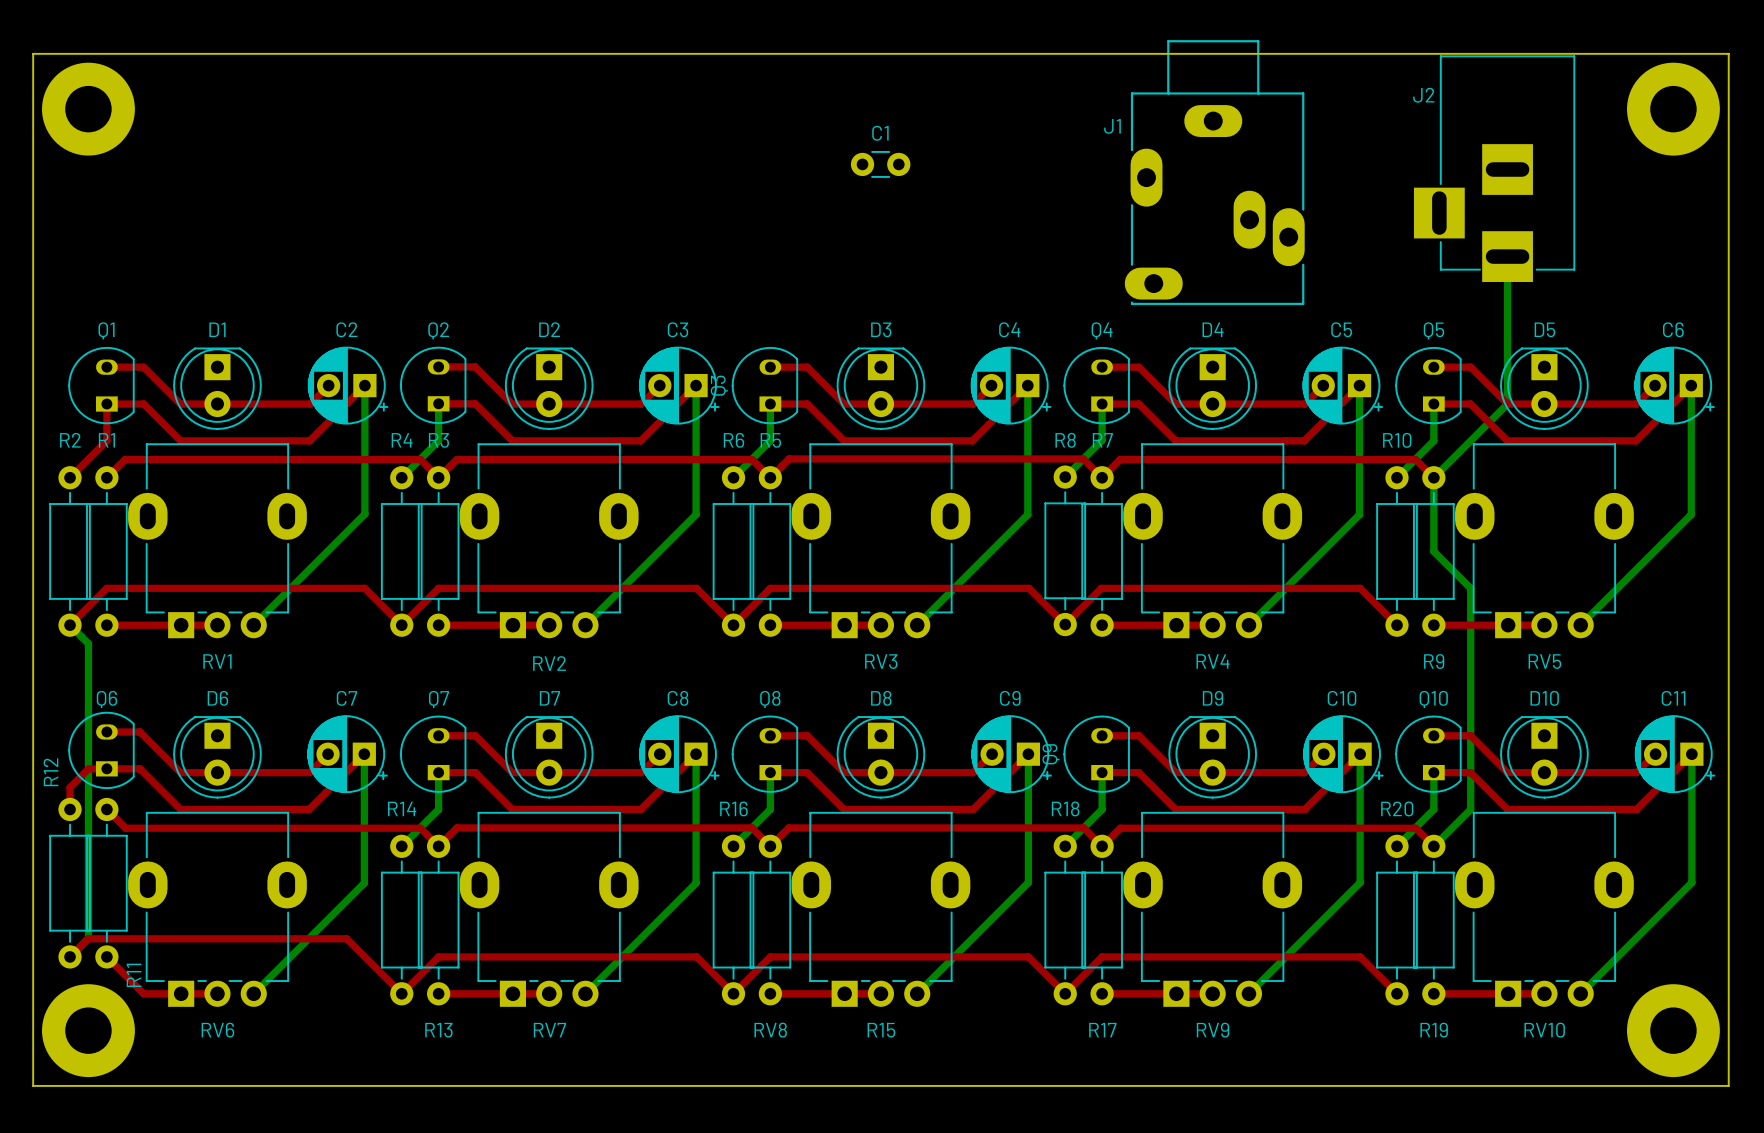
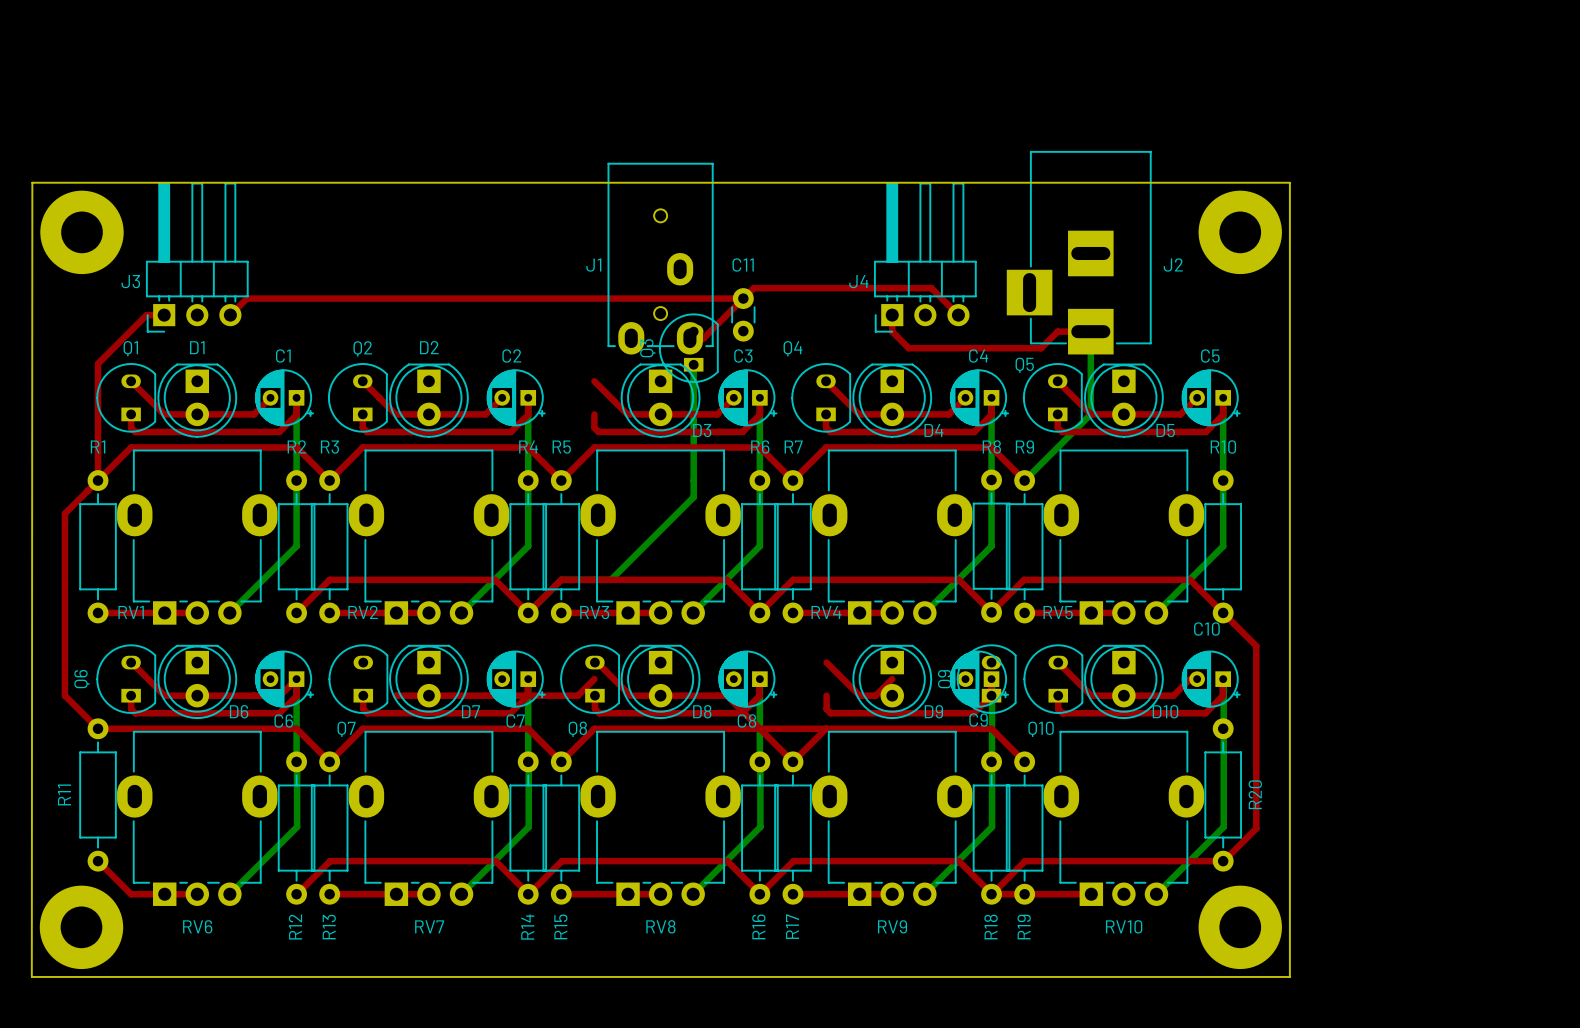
J1 footprint: [1124, 40, 1305, 305] -> [607, 162, 714, 355]
J2 name position: J2 (1423, 95) -> J2 (1173, 264)
part position: (88, 109) -> (81, 232)
part position: (1673, 109) -> (1240, 232)
J1 name position: J1 (1112, 126) -> J1 (593, 265)
C1 footprint: [850, 151, 911, 178] -> [255, 369, 314, 427]
J2 position: (1494, 168) -> (1079, 252)
bottom track: (1507, 269) (1507, 404) (1433, 477) (1433, 551) (1470, 588) (1470, 809) (1433, 846) -> none
J3: none -> (197, 257)
J4: none -> (925, 257)
D3 name position: D3 (881, 329) -> D3 (702, 430)
D4 name position: D4 (1213, 329) -> D4 (933, 430)
D5 name position: D5 (1544, 329) -> D5 (1165, 430)
C6 name position: C6 (1673, 329) -> C6 (283, 721)
top track: none -> (743, 298) (246, 298) (230, 315)
Q4 name position: Q4 (1102, 330) -> Q4 (792, 348)
Q5 name position: Q5 (1433, 330) -> Q5 (1024, 365)
C2 footprint: [307, 346, 389, 425] -> [486, 369, 546, 427]
C3 footprint: [639, 346, 720, 425] -> [718, 369, 778, 427]
C4 footprint: [970, 346, 1052, 425] -> [950, 369, 1009, 427]
C5 footprint: [1302, 346, 1383, 425] -> [1181, 369, 1241, 427]
C6 footprint: [1634, 346, 1715, 425] -> [255, 650, 314, 708]
D4 footprint: [1168, 347, 1257, 430] -> [852, 363, 932, 438]
top track: none -> (892, 315) (892, 331) (908, 348) (1041, 348) (1057, 331) (1090, 331)
top track: none -> (958, 315) (931, 288) (753, 288) (703, 338) (689, 338)
top track: (438, 366) (475, 366) (512, 404) (641, 404) (659, 385) -> none
top track: (106, 367) (143, 367) (180, 404) (310, 404) (328, 385) -> none
top track: (770, 367) (807, 367) (844, 404) (973, 404) (991, 385) -> none
top track: (1102, 367) (1138, 367) (1175, 404) (1304, 404) (1323, 385) -> none
bottom track: none -> (1090, 331) (1090, 414) (1024, 480)
top track: (1433, 367) (1470, 367) (1507, 404) (1636, 404) (1655, 385) -> none
Q1 position: (101, 385) -> (126, 397)
top track: (364, 385) (309, 440) (180, 440) (143, 404) (106, 404) -> (164, 315) (146, 315) (98, 364)
bottom track: (364, 385) (364, 514) (253, 625) -> none
Q2 position: (433, 385) -> (357, 397)
top track: (696, 385) (640, 440) (512, 440) (475, 403) (438, 403) -> none
bottom track: (696, 385) (696, 514) (585, 625) -> none
top track: (1027, 385) (972, 440) (844, 440) (807, 404) (770, 404) -> none
bottom track: (1027, 385) (1027, 514) (917, 625) -> none
Q4 position: (1096, 385) -> (821, 397)
top track: (1359, 385) (1304, 440) (1175, 440) (1138, 404) (1102, 404) -> none
bottom track: (1359, 385) (1359, 514) (1248, 625) -> none
Q5 position: (1428, 385) -> (1052, 397)
top track: (1691, 385) (1636, 440) (1507, 440) (1470, 404) (1433, 404) -> none
bottom track: (1691, 385) (1691, 514) (1580, 625) -> none
D1 position: (217, 388) -> (197, 400)
D2 position: (549, 388) -> (428, 400)
D3 position: (880, 388) -> (660, 400)
D5 position: (1544, 388) -> (1123, 400)
bottom track: (438, 403) (438, 440) (401, 477) -> none
bottom track: (1102, 404) (1102, 440) (1065, 477) -> none
bottom track: (1433, 404) (1433, 440) (1396, 477) -> none
top track: none -> (131, 381) (164, 414) (253, 414) (270, 397)
top track: none -> (362, 381) (395, 414) (485, 414) (502, 397)
top track: none -> (594, 381) (627, 414) (717, 414) (733, 397)
top track: none -> (826, 381) (859, 414) (948, 414) (965, 397)
top track: none -> (1057, 381) (1090, 414) (1180, 414) (1197, 397)
top track: (106, 440) (70, 477) -> (98, 397) (98, 480)
top track: none -> (296, 397) (296, 414) (279, 431) (135, 431) (131, 427) (131, 414)
bottom track: none -> (296, 397) (296, 546) (229, 612)
top track: none -> (528, 397) (528, 414) (511, 431) (367, 431) (362, 427) (362, 414)
bottom track: none -> (528, 397) (528, 546) (461, 612)
bottom track: (770, 440) (733, 477) -> (693, 397) (693, 497) (610, 579) (561, 579) (528, 612)
top track: none -> (759, 397) (759, 414) (742, 431) (598, 431) (594, 427) (594, 414)
bottom track: none -> (759, 397) (759, 546) (693, 612)
top track: none -> (991, 397) (991, 414) (974, 431) (830, 431) (826, 427) (826, 414)
bottom track: none -> (991, 397) (991, 546) (924, 612)
top track: none -> (1223, 397) (1223, 414) (1205, 431) (1061, 431) (1057, 427) (1057, 414)
bottom track: none -> (1223, 397) (1223, 546) (1156, 612)
top track: (106, 477) (125, 459) (420, 459) (438, 477) (456, 459) (752, 459) (770, 477) (789, 458) (1083, 458) (1102, 477) (1120, 459) (1415, 459) (1433, 477) -> none
RV1 position: (217, 540) -> (197, 537)
RV2 position: (549, 540) -> (428, 537)
RV3 position: (880, 540) -> (660, 537)
RV4 position: (1212, 540) -> (892, 537)
RV5 position: (1544, 540) -> (1123, 537)
R8 position: (1065, 550) -> (991, 546)
R2 position: (70, 551) -> (296, 546)
R1 position: (106, 551) -> (98, 546)
R4 position: (401, 551) -> (528, 546)
R3 position: (438, 551) -> (329, 546)
R6 position: (733, 551) -> (759, 546)
R5 position: (770, 551) -> (561, 546)
R7 position: (1102, 551) -> (792, 546)
R10 position: (1396, 551) -> (1223, 546)
R9 position: (1433, 551) -> (1024, 546)
top track: (70, 625) (106, 588) (364, 588) (401, 625) (438, 588) (696, 588) (733, 625) (770, 588) (1029, 588) (1065, 624) (1101, 588) (1360, 588) (1396, 625) -> none
bottom track: (70, 625) (88, 643) (88, 938) (70, 956) -> none
top track: (106, 625) (217, 625) -> (98, 612) (197, 612)
top track: (438, 625) (549, 625) -> (329, 612) (428, 612)
top track: (770, 625) (880, 625) -> (792, 612) (892, 612)
top track: (1102, 625) (1212, 625) -> (1024, 612) (1123, 612)
top track: (1433, 625) (1544, 625) -> none
RV1 name position: RV1 (217, 661) -> RV1 (131, 612)
RV3 name position: RV3 (881, 661) -> RV3 (594, 612)
RV4 name position: RV4 (1213, 661) -> RV4 (826, 612)
R9 name position: R9 (1434, 661) -> R9 (1024, 447)
RV5 name position: RV5 (1544, 661) -> RV5 (1058, 612)
RV2 name position: RV2 (549, 663) -> RV2 (363, 612)
top track: none -> (561, 612) (660, 612)
D6 name position: D6 (217, 698) -> D6 (239, 711)
C7 name position: C7 (346, 698) -> C7 (515, 721)
D7 name position: D7 (549, 698) -> D7 (470, 711)
C8 name position: C8 (678, 698) -> C8 (746, 720)
D8 name position: D8 (881, 698) -> D8 (702, 711)
C9 name position: C9 (1010, 698) -> C9 (978, 720)
D9 name position: D9 (1212, 698) -> D9 (933, 711)
D10 name position: D10 (1544, 698) -> D10 (1165, 711)
Q6 name rotation: 0° (106, 699) -> 90° counterclockwise (81, 679)
Q6 name position: Q6 (106, 699) -> Q6 (81, 679)
Q7 name position: Q7 (439, 699) -> Q7 (346, 729)
Q8 name position: Q8 (770, 699) -> Q8 (577, 729)
Q10 name position: Q10 (1433, 699) -> Q10 (1041, 729)
C7 footprint: [307, 715, 388, 794] -> [486, 650, 546, 708]
C8 footprint: [639, 715, 720, 794] -> [718, 650, 778, 708]
C9 footprint: [971, 715, 1052, 794] -> [950, 650, 1009, 708]
C10 footprint: [1303, 715, 1384, 794] -> [1181, 650, 1241, 708]
C11 footprint: [1634, 715, 1716, 794] -> [731, 288, 756, 342]
D9 footprint: [1168, 716, 1257, 799] -> [852, 645, 932, 719]
top track: (106, 731) (139, 731) (181, 772) -> (131, 662) (164, 695)
top track: (438, 735) (475, 735) (512, 772) -> none
top track: none -> (594, 662) (597, 662) (630, 695) (693, 695)
top track: (770, 735) (807, 735) (844, 772) (955, 772) -> (826, 662) (859, 695)
top track: (1102, 735) (1138, 735) (1175, 772) (1213, 772) -> (1058, 662) (1091, 695)
top track: (1433, 735) (1470, 735) (1507, 772) (1636, 772) (1655, 754) -> none
Q6 position: (101, 750) -> (126, 679)
top track: none -> (296, 679) (296, 696) (279, 713) (135, 713) (131, 709) (131, 695)
bottom track: none -> (296, 679) (296, 761)
top track: (364, 754) (309, 809) -> (462, 728) (362, 728) (329, 761) (296, 728) (279, 728)
bottom track: (364, 754) (364, 883) (328, 918) -> (297, 761) (297, 827)
Q7 position: (433, 754) -> (358, 679)
top track: none -> (527, 679) (527, 696) (510, 713) (367, 713) (363, 709) (363, 695)
bottom track: none -> (528, 679) (528, 761)
top track: (696, 754) (640, 809) (586, 809) -> (826, 728) (792, 761) (759, 728) (594, 728) (561, 761) (528, 728)
bottom track: (696, 754) (696, 883) (585, 993) -> none
Q8 position: (764, 754) -> (590, 679)
top track: none -> (759, 679) (759, 696) (742, 713) (599, 713) (594, 709) (594, 695)
bottom track: none -> (759, 679) (759, 761)
top track: (1028, 754) (973, 809) -> (1024, 761) (991, 728) (875, 728)
bottom track: (1028, 754) (1028, 882) (917, 993) -> none
top track: none -> (991, 679) (991, 696) (973, 713) (830, 713) (826, 709) (826, 695)
bottom track: none -> (991, 679) (992, 827) (924, 894)
top track: (1360, 754) (1304, 809) (1175, 809) (1138, 772) (1102, 772) -> (1222, 679) (1222, 696) (1205, 713) (1062, 713) (1058, 709) (1058, 695)
bottom track: (1360, 754) (1360, 882) (1248, 993) -> none
Q10 position: (1428, 754) -> (1053, 679)
top track: (1691, 754) (1636, 809) (1507, 809) (1470, 772) (1433, 772) -> none
bottom track: (1691, 754) (1691, 882) (1580, 993) -> none
bottom track: none -> (1223, 680) (1223, 827) (1156, 894)
D7 position: (549, 757) -> (428, 681)
D8 position: (880, 757) -> (660, 681)
D10 position: (1544, 757) -> (1123, 681)
R12 name position: R12 (50, 772) -> R12 (295, 927)
bottom track: (438, 772) (438, 809) (401, 846) -> none
top track: (475, 772) (512, 809) -> (428, 695) (462, 695)
bottom track: (770, 772) (770, 809) (733, 846) -> none
bottom track: (1102, 772) (1102, 809) (1065, 846) -> none
bottom track: (1433, 772) (1433, 809) (1396, 846) -> none
R14 name rotation: 0° (402, 808) -> 90° counterclockwise (527, 927)
R14 name position: R14 (402, 808) -> R14 (527, 927)
R16 name rotation: 0° (733, 808) -> 90° counterclockwise (758, 926)
R16 name position: R16 (733, 808) -> R16 (758, 926)
R20 name rotation: 0° (1397, 808) -> 90° counterclockwise (1255, 794)
R20 name position: R20 (1397, 808) -> R20 (1255, 794)
top track: (70, 809) (70, 787) (88, 768) (139, 768) (180, 809) -> (1024, 480) (991, 447) (826, 447) (792, 480) (759, 447) (594, 447) (561, 480) (528, 447) (362, 447) (329, 480) (296, 447) (131, 447) (64, 513) (64, 695) (98, 728) (164, 728)
top track: (106, 809) (125, 828) (420, 828) (438, 846) (457, 827) (751, 827) (770, 846) (788, 827) (1083, 827) (1102, 846) (1120, 828) (1415, 828) (1433, 846) -> none
bottom track: none -> (528, 761) (528, 827) (461, 894)
bottom track: none -> (760, 761) (760, 827) (693, 894)
R12 position: (70, 883) -> (296, 828)
RV7 position: (549, 909) -> (428, 818)
RV8 position: (880, 909) -> (660, 818)
RV9 position: (1212, 909) -> (892, 818)
RV10 position: (1544, 909) -> (1123, 818)
R14 position: (401, 920) -> (528, 828)
R13 position: (438, 920) -> (329, 828)
R16 position: (733, 920) -> (759, 828)
R15 position: (770, 920) -> (561, 828)
R17: none -> (792, 828)
R18: (1065, 920) -> none
R20 position: (1396, 920) -> (1223, 794)
R19 position: (1433, 920) -> (1024, 828)
top track: (70, 956) (88, 938) (346, 938) (401, 993) (438, 956) -> (297, 894) (330, 861) (395, 861)
top track: (549, 956) (623, 956) -> (495, 861) (528, 894) (561, 861)
top track: (696, 956) (733, 993) (770, 956) -> (627, 861) (693, 861)
top track: (807, 956) (881, 956) -> (727, 861) (760, 894) (793, 861)
top track: (1028, 956) (1065, 993) (1102, 956) (1138, 956) -> (925, 861) (958, 861) (992, 894) (1025, 861)
top track: (1360, 956) (1396, 993) -> (1223, 861) (1256, 828) (1256, 646) (1190, 579) (1024, 579) (991, 612) (959, 579) (792, 579) (759, 612) (726, 579) (561, 579) (528, 612) (495, 579) (329, 579) (296, 612)
R11 name position: R11 (133, 975) -> R11 (64, 794)
top track: (475, 993) (549, 993) -> (329, 894) (395, 894)
top track: none -> (561, 894) (660, 894)
top track: (770, 993) (880, 993) -> (892, 894) (792, 894)
top track: (1433, 993) (1544, 993) -> none
R13 name rotation: 0° (438, 1030) -> 90° counterclockwise (329, 927)
RV8 name position: RV8 (770, 1030) -> RV8 (660, 926)
R15 name rotation: 0° (881, 1030) -> 90° counterclockwise (560, 926)
R15 name position: R15 (881, 1030) -> R15 (560, 926)
R17 name: R17 (1102, 1030) -> R18 (991, 927)
R19 name rotation: 0° (1434, 1030) -> 90° counterclockwise (1024, 927)
part position: (1673, 1030) -> (1240, 927)
board edge: (33, 1085) (33, 53) (1728, 53) (1728, 1085) (1434, 1085) -> (31, 976) (32, 182) (1289, 182) (1289, 976)

